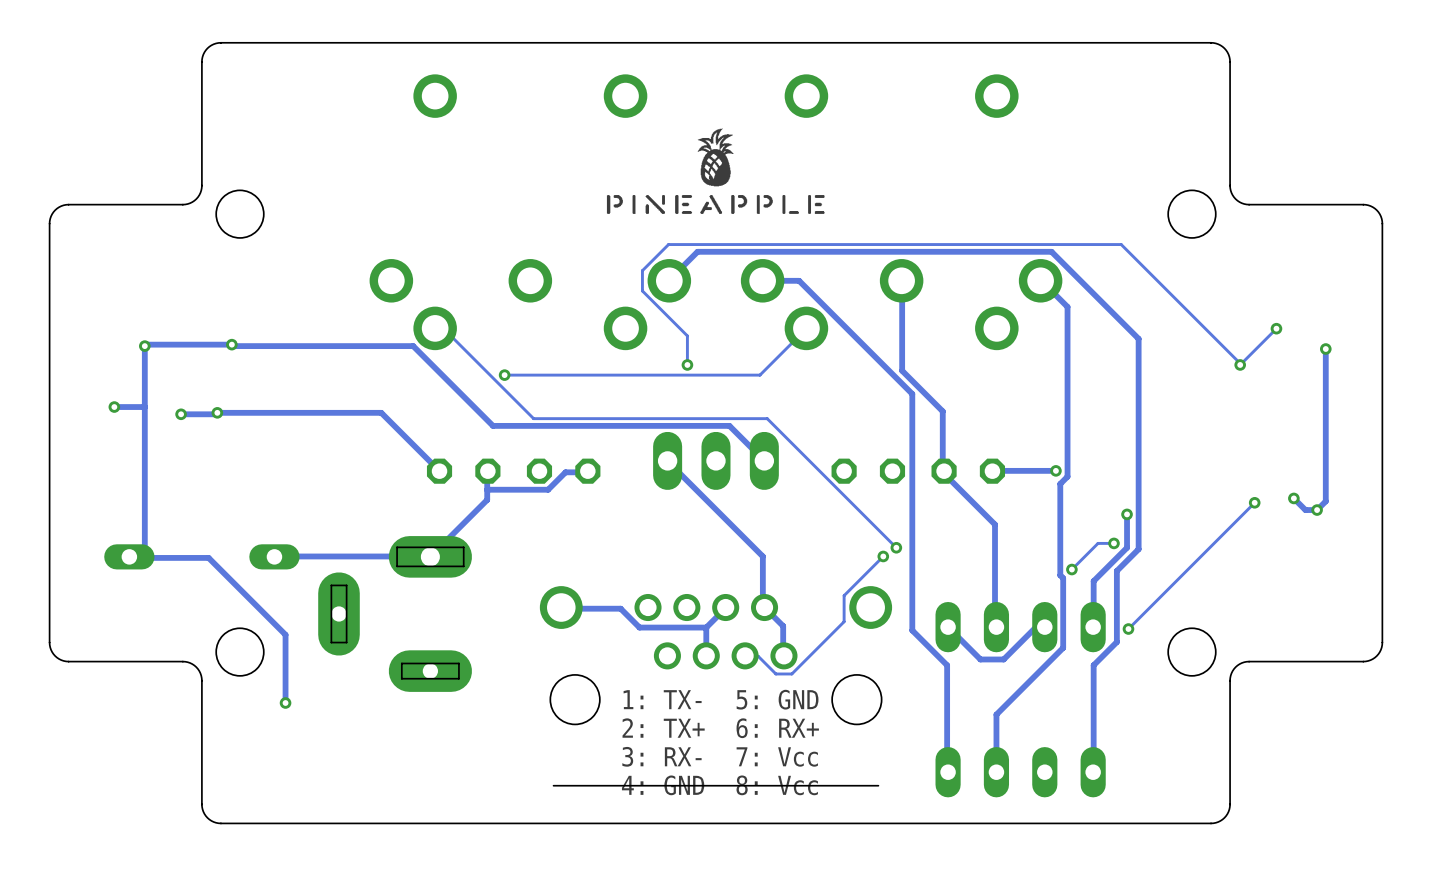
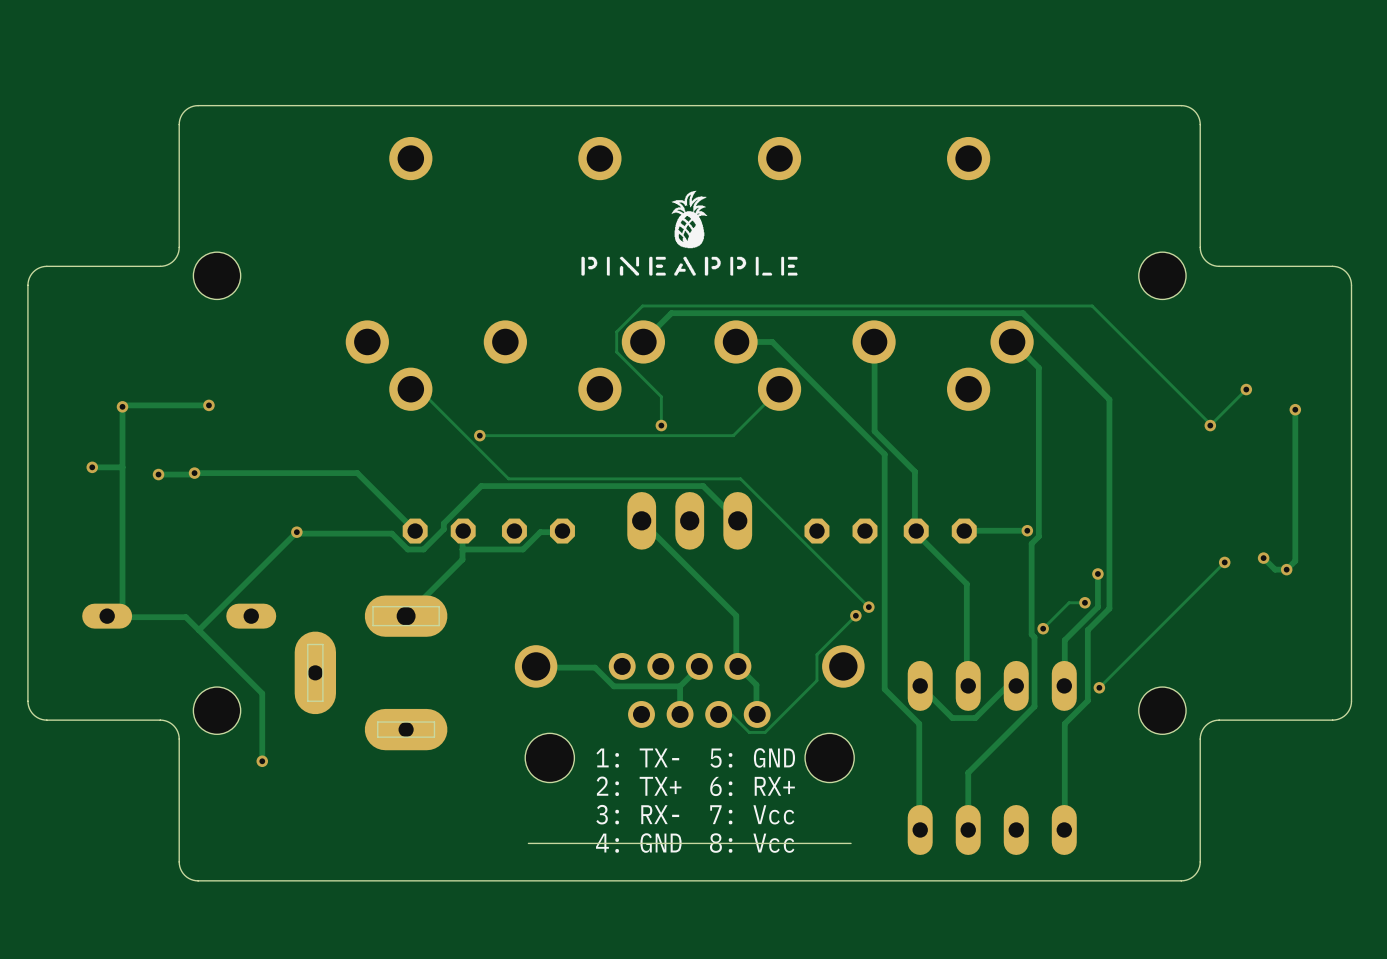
track: (231, 344) (413, 346) (493, 425) (506, 425) -> (198, 630) (296, 532) (391, 533) (407, 549) (423, 549) (443, 529) (443, 523) (481, 486)
via: none -> (296, 532)
track: (430, 556) (274, 556) -> none

